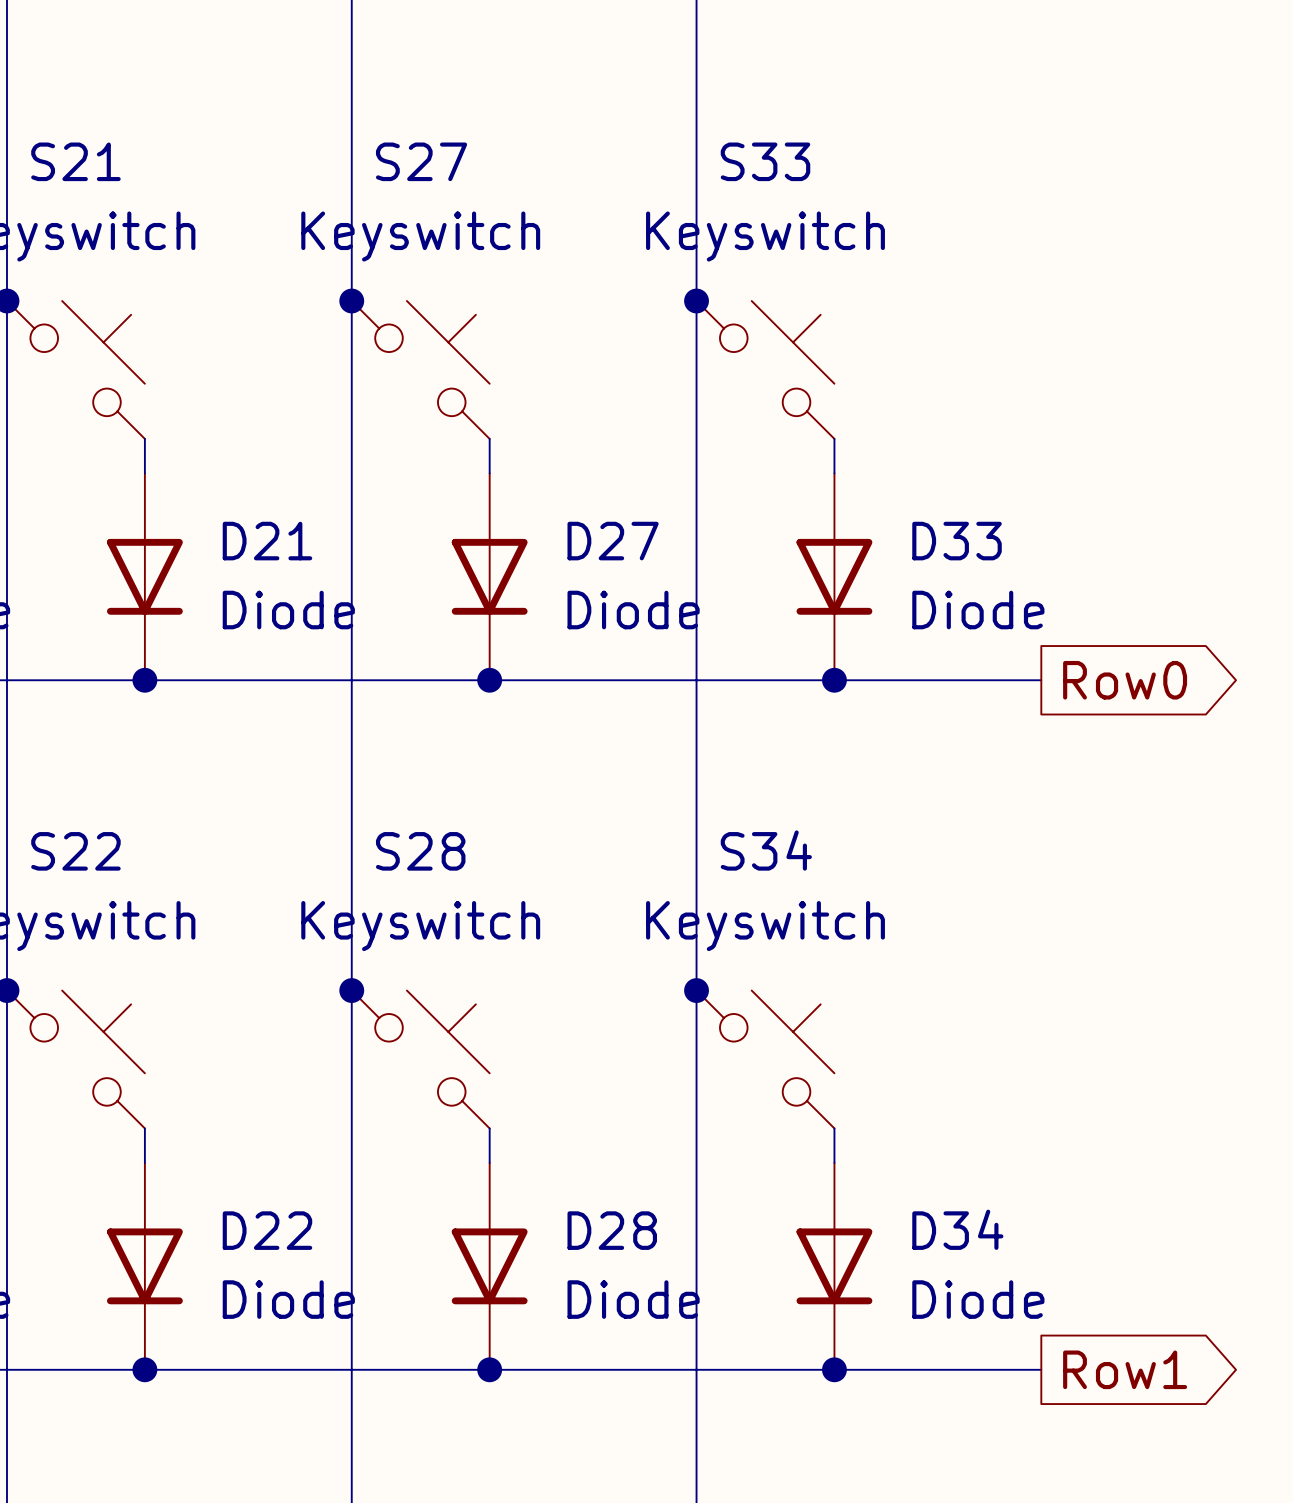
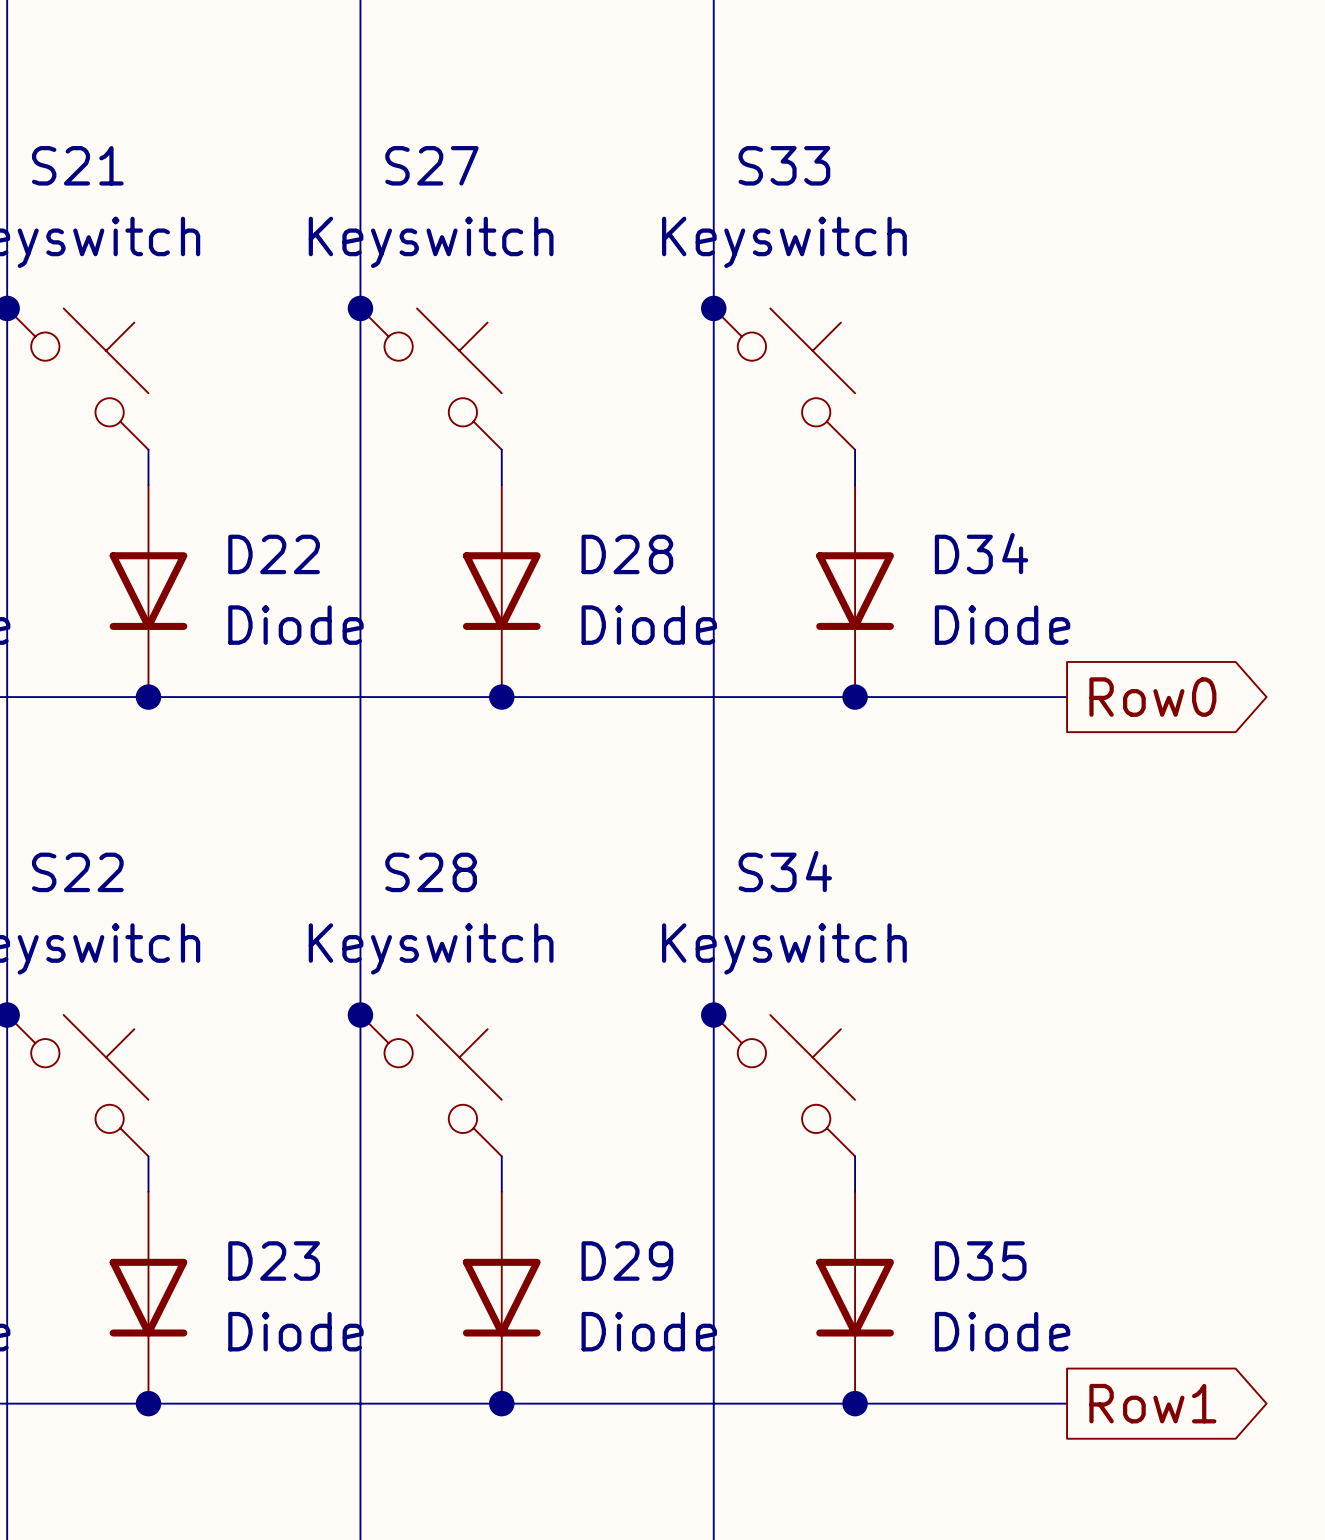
D21 name: D21 (267, 541) -> D22 (274, 554)
D27 name: D27 (613, 541) -> D28 (627, 554)
D33 name: D33 (957, 541) -> D34 (981, 553)
D34 name: D34 (957, 1229) -> D35 (980, 1261)
D22 name: D22 (267, 1230) -> D23 (274, 1261)
D28 name: D28 (612, 1230) -> D29 (627, 1261)

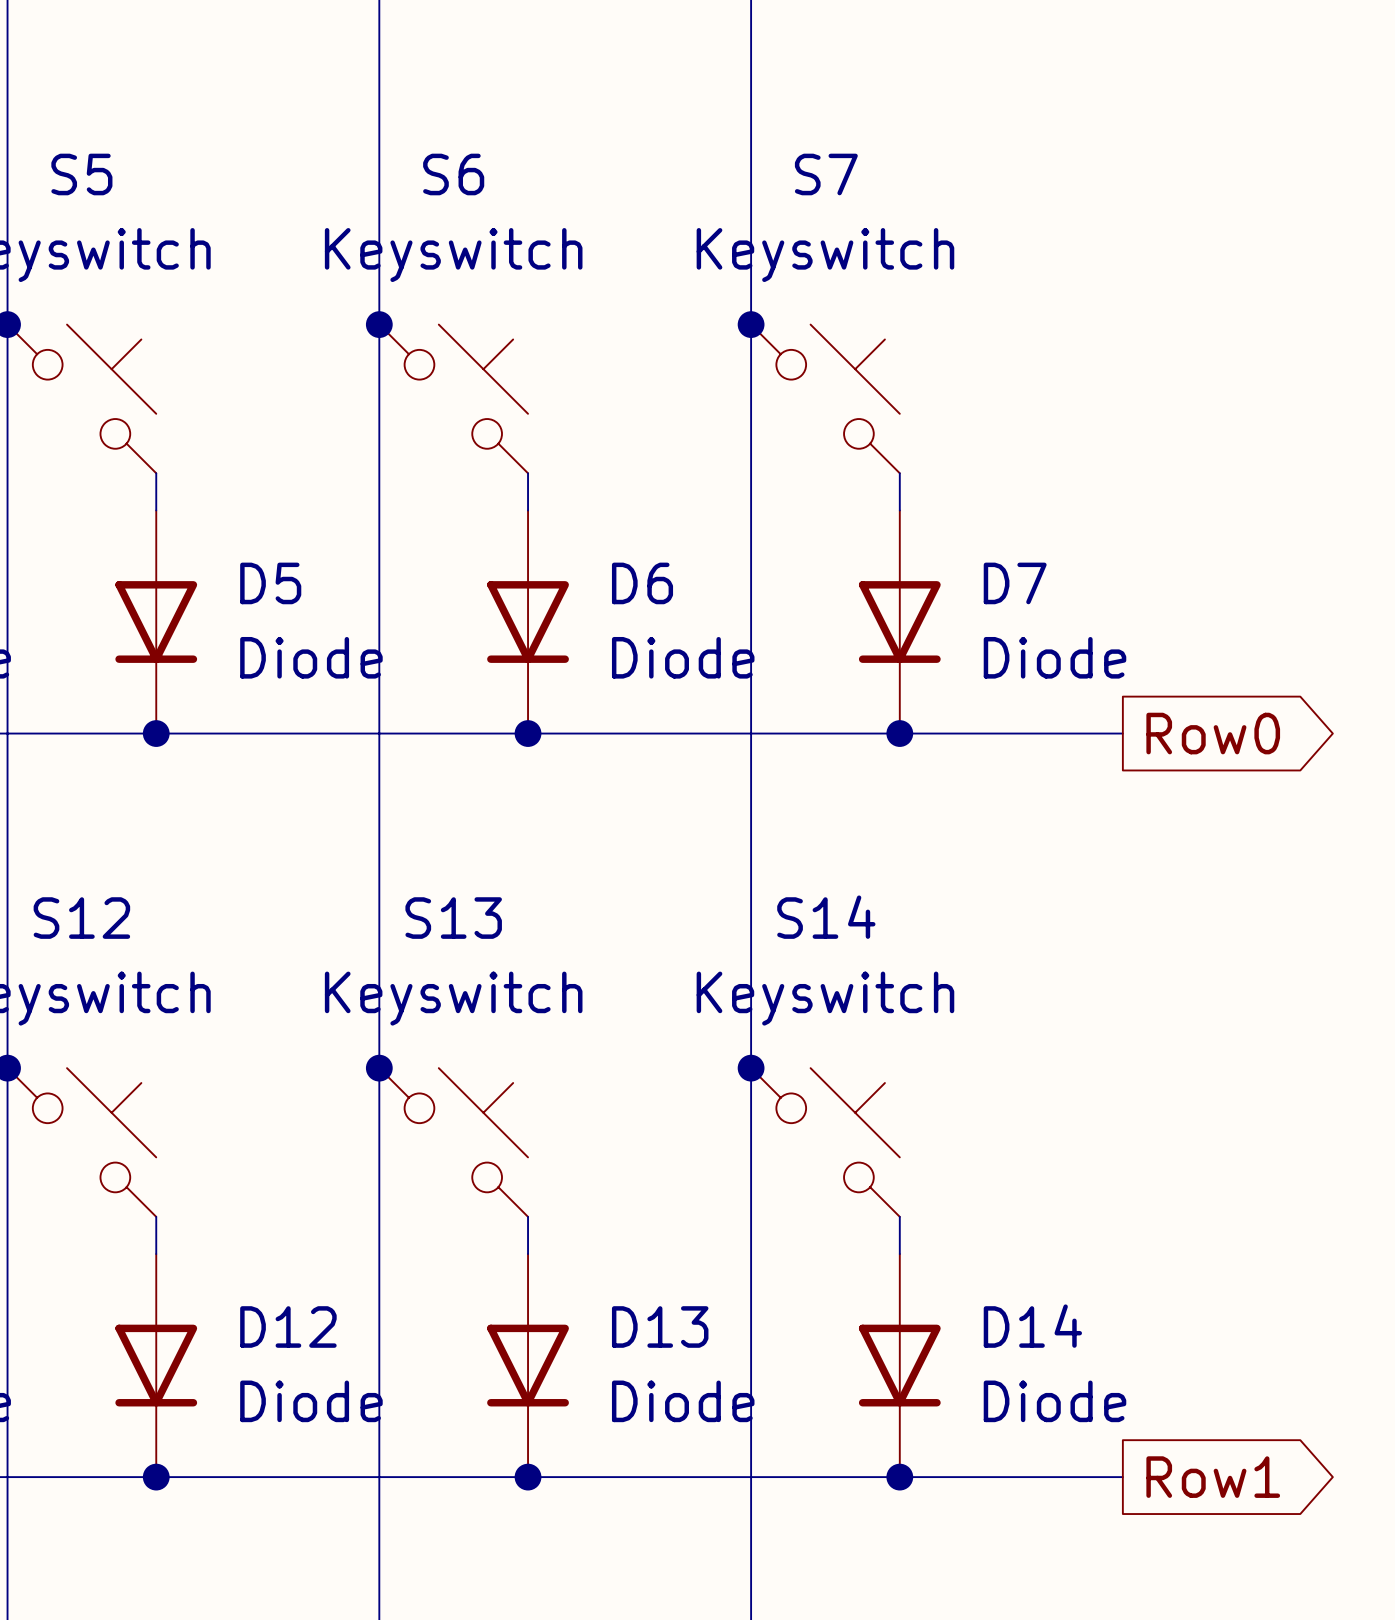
S21 name: S21 (77, 165) -> S5 (81, 174)
S27 name: S27 (431, 165) -> S6 (453, 174)
S33 name: S33 (784, 165) -> S7 (826, 174)
D34 name: D34 (981, 553) -> D7 (1015, 583)
D22 name: D22 (274, 554) -> D5 (270, 583)
D28 name: D28 (627, 554) -> D6 (642, 583)
S34 name: S34 (785, 871) -> S14 (826, 917)
S22 name: S22 (77, 872) -> S12 (81, 918)
S28 name: S28 (431, 872) -> S13 (453, 918)
D23 name: D23 (274, 1261) -> D12 (288, 1326)
D29 name: D29 (627, 1261) -> D13 (660, 1326)
D35 name: D35 (980, 1261) -> D14 (1032, 1326)

